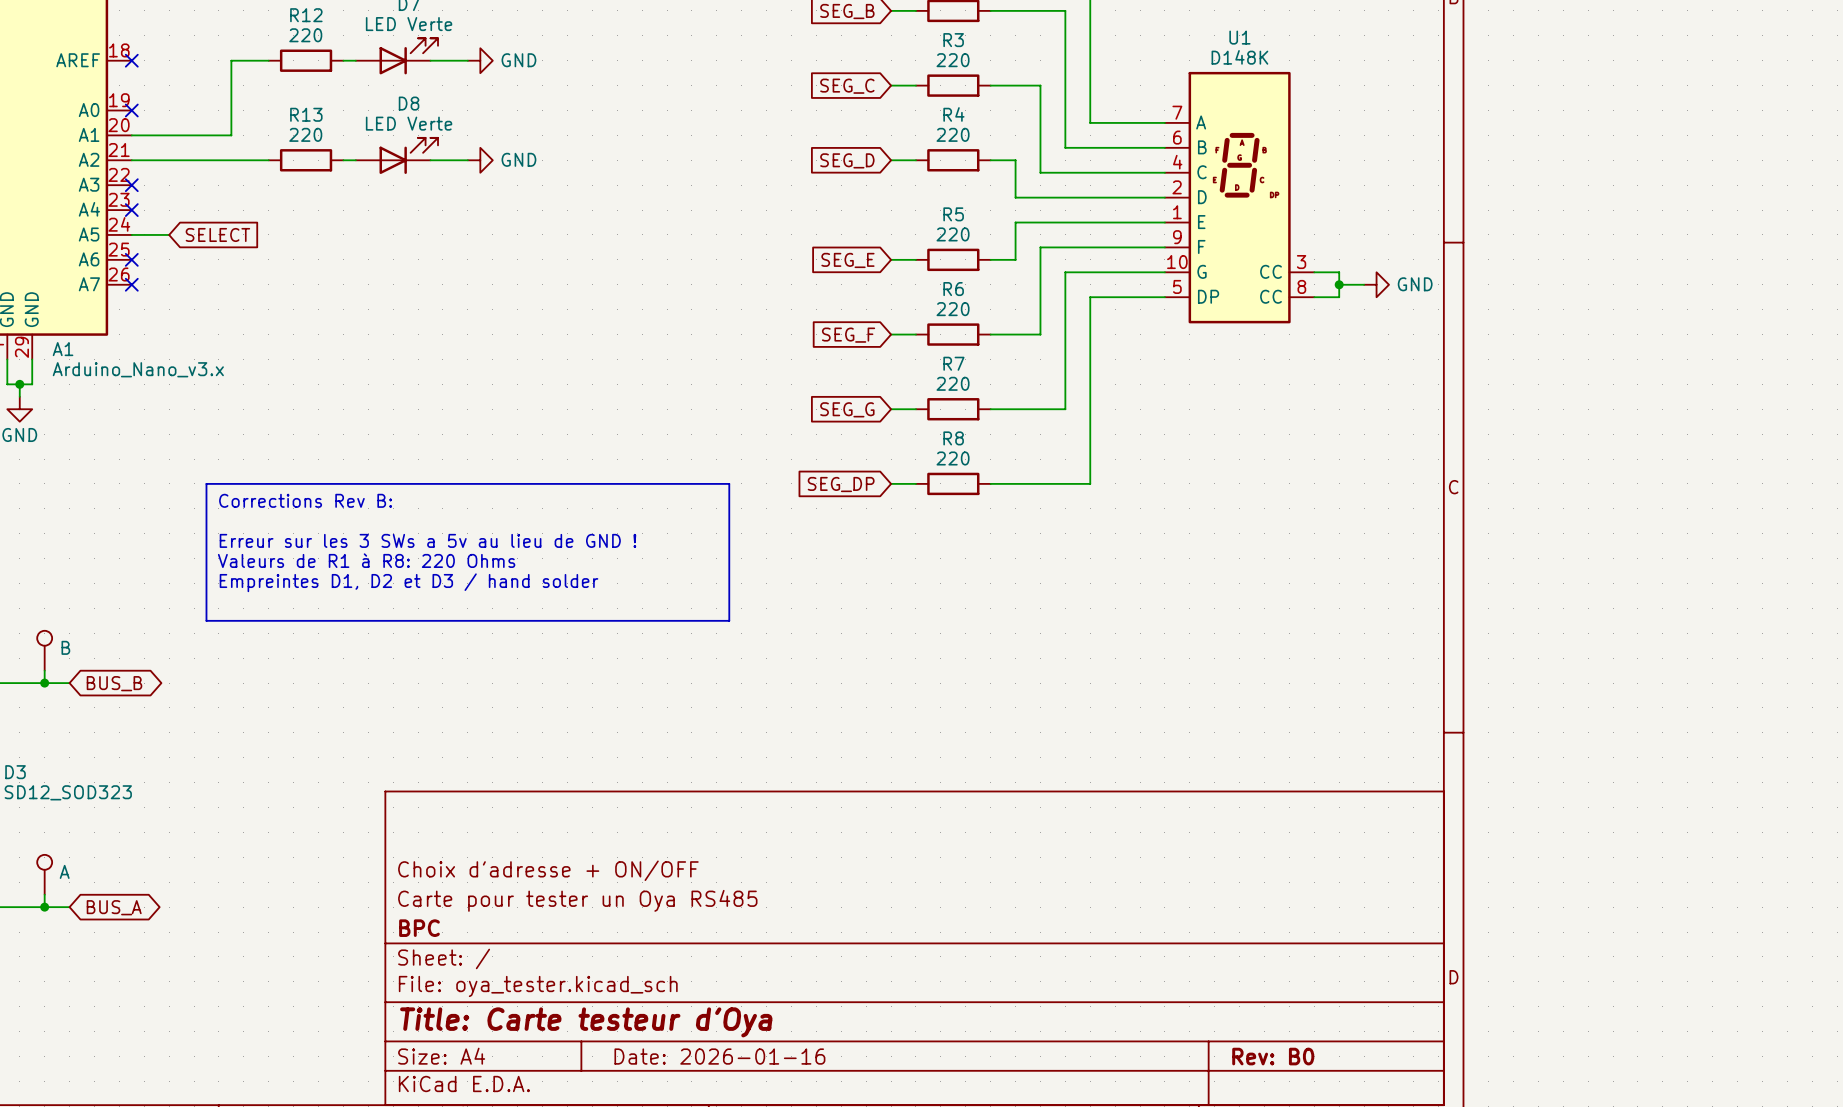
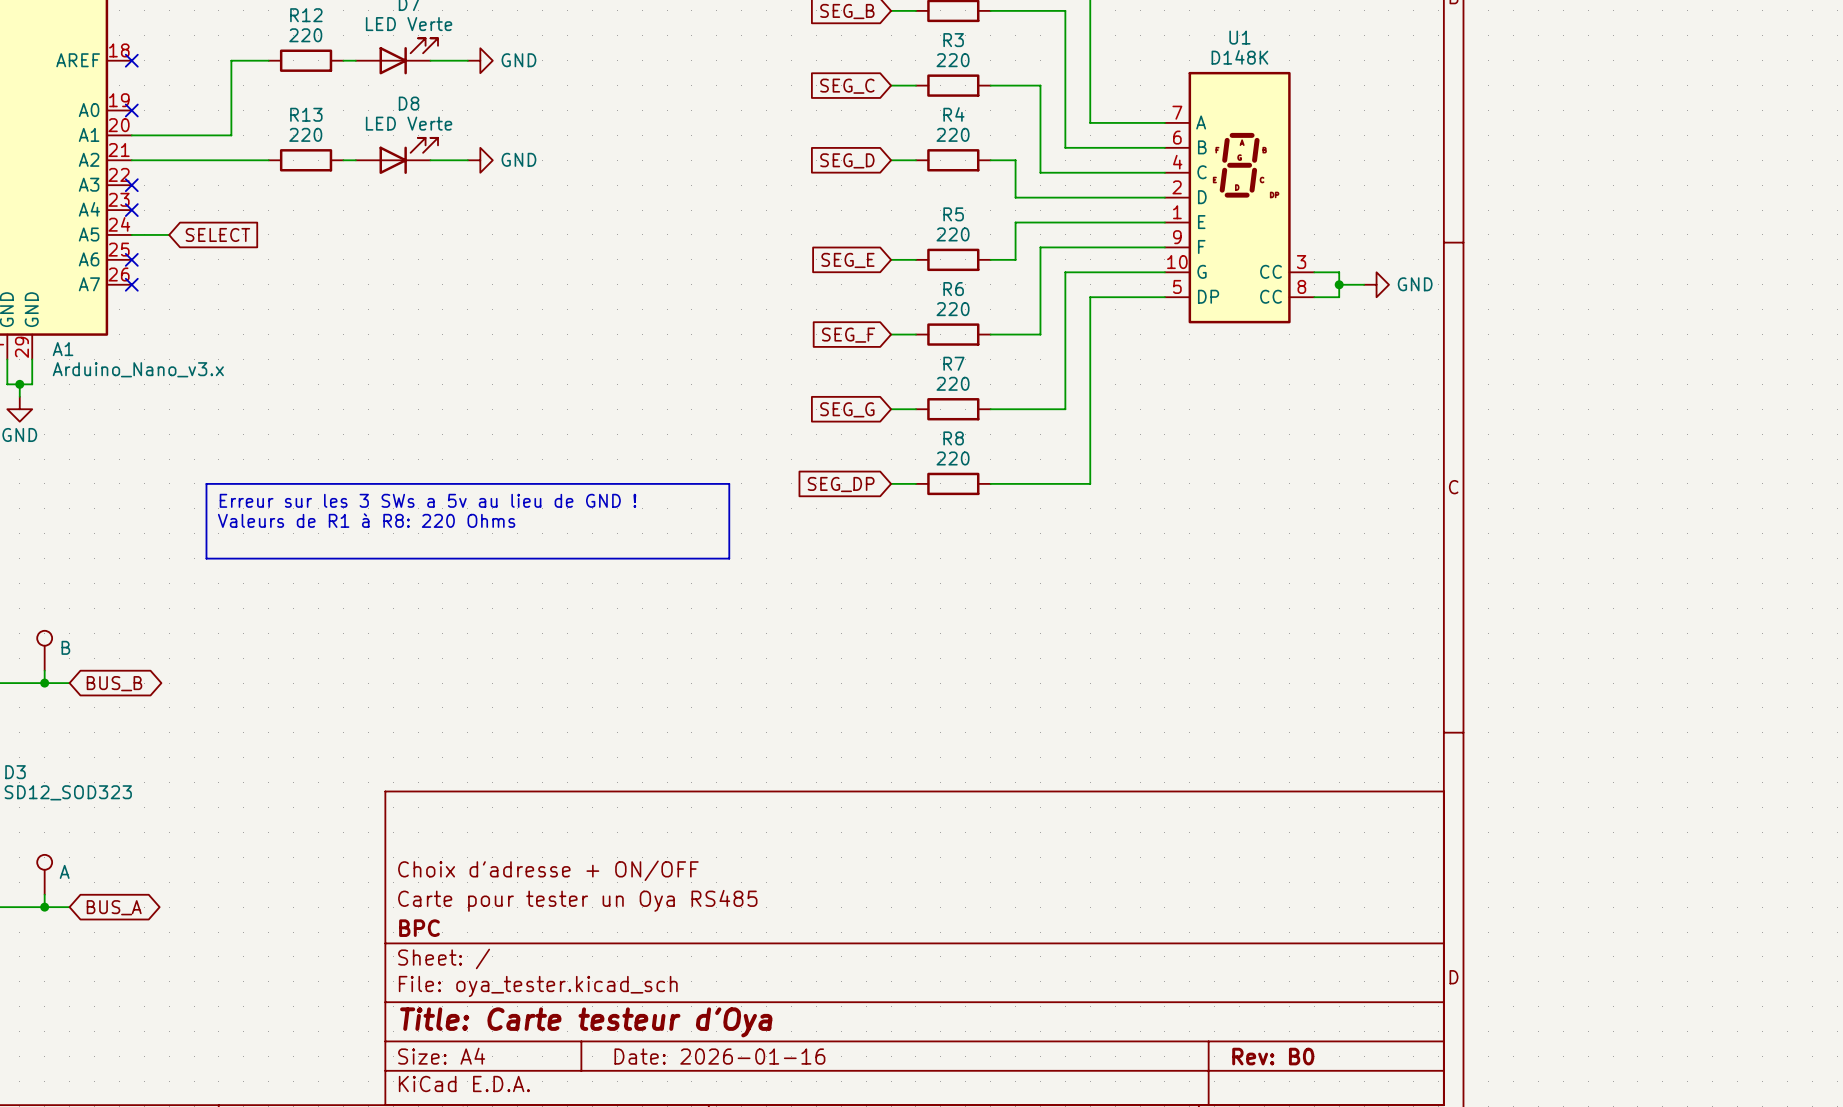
text: Corrections Rev B: (305, 500) -> Erreur sur les 3 SWs a 5v au lieu de GND ! (427, 500)
text: Erreur sur les 3 SWs a 5v au lieu de GND ! (427, 540) -> none
line: (206, 558) (206, 620) (729, 620) (729, 558) -> (206, 558) (729, 558)
text position: Valeurs de R1 à R8: 220 Ohms (366, 560) -> Valeurs de R1 à R8: 220 Ohms (366, 520)
text: Empreintes D1, D2 et D3 / hand solder (409, 582) -> none

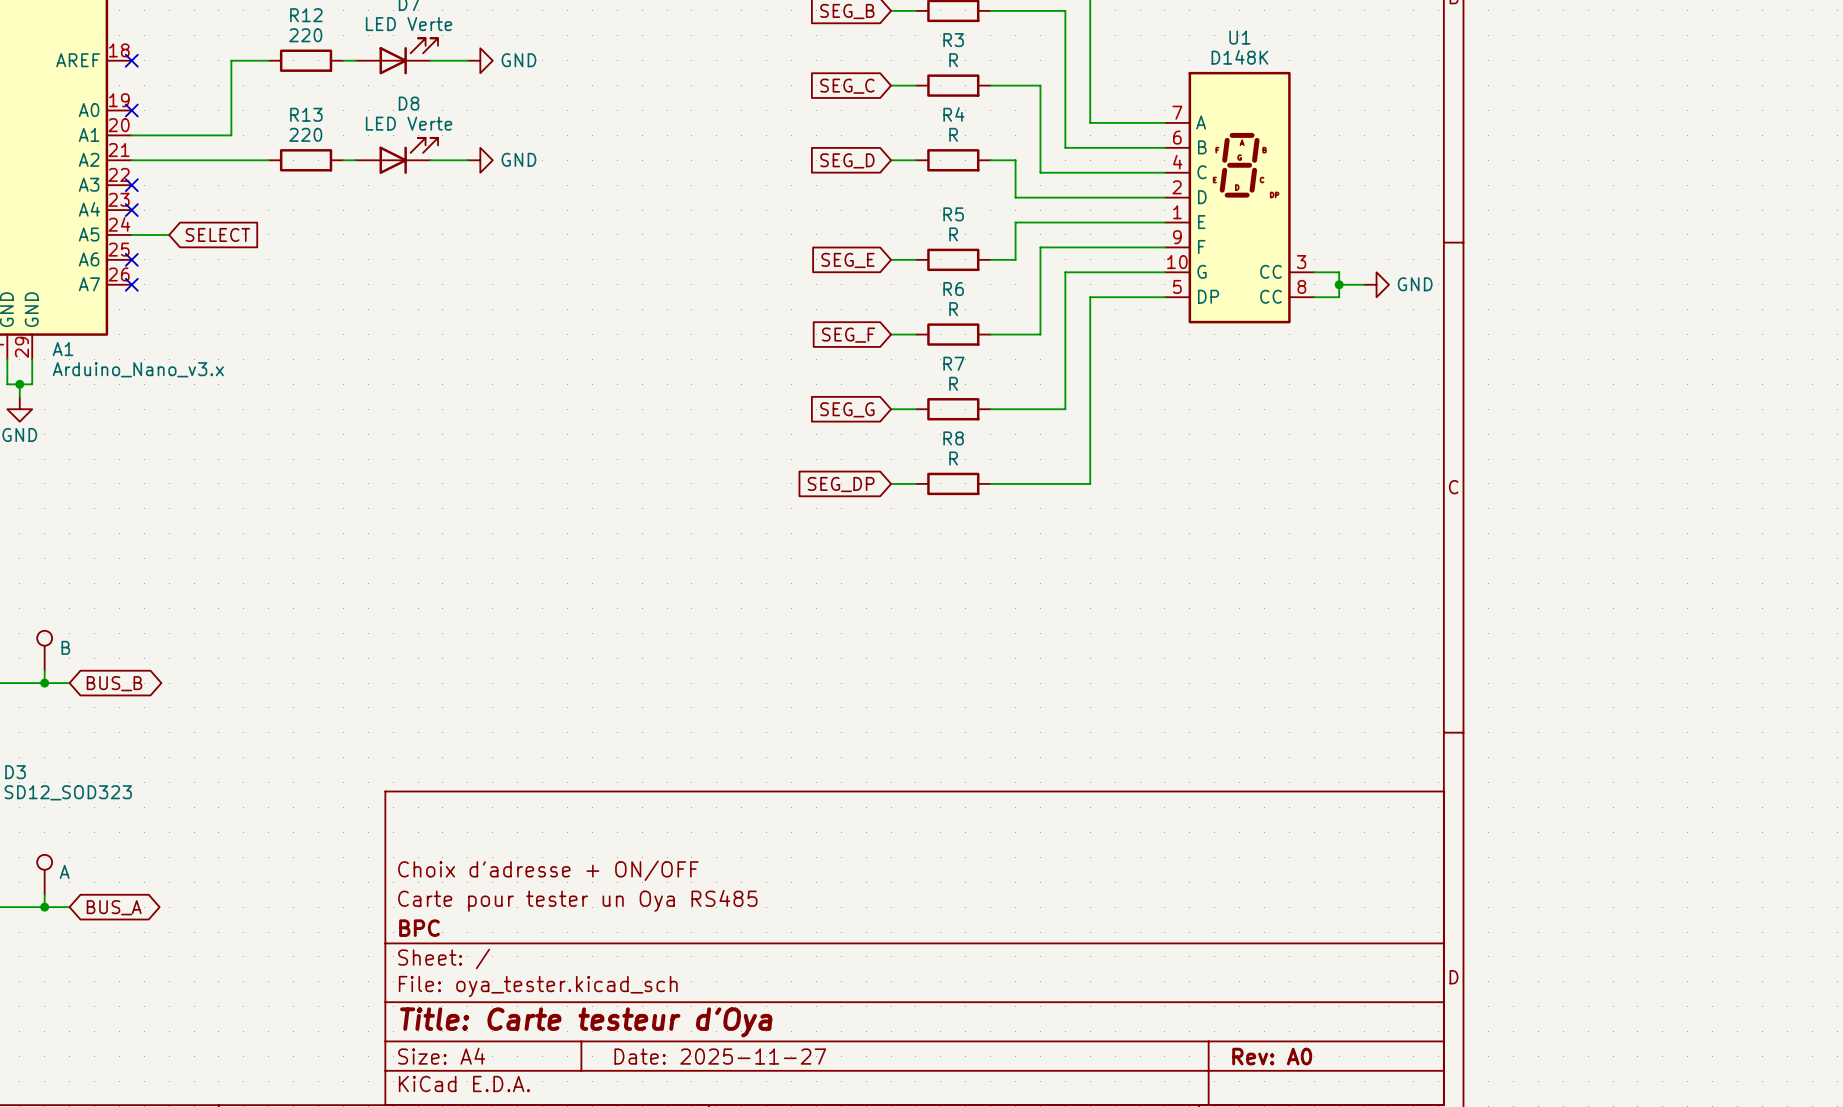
R3 value: 220 (953, 60) -> R (953, 60)
R4 value: 220 (953, 134) -> R (953, 134)
R5 value: 220 (953, 234) -> R (953, 234)
R6 value: 220 (953, 309) -> R (953, 309)
R7 value: 220 (953, 383) -> R (953, 383)
R8 value: 220 (953, 458) -> R (953, 458)
line: (206, 483) (729, 483) (729, 558) (206, 558) (206, 483) -> none
text: Erreur sur les 3 SWs a 5v au lieu de GND ! (427, 500) -> none
text: Valeurs de R1 à R8: 220 Ohms (366, 520) -> none
title block: Date: 2026-01-16 (719, 1056) -> Date: 2025-11-27 (720, 1056)
title block: Rev: B0 (1273, 1056) -> Rev: A0 (1272, 1056)

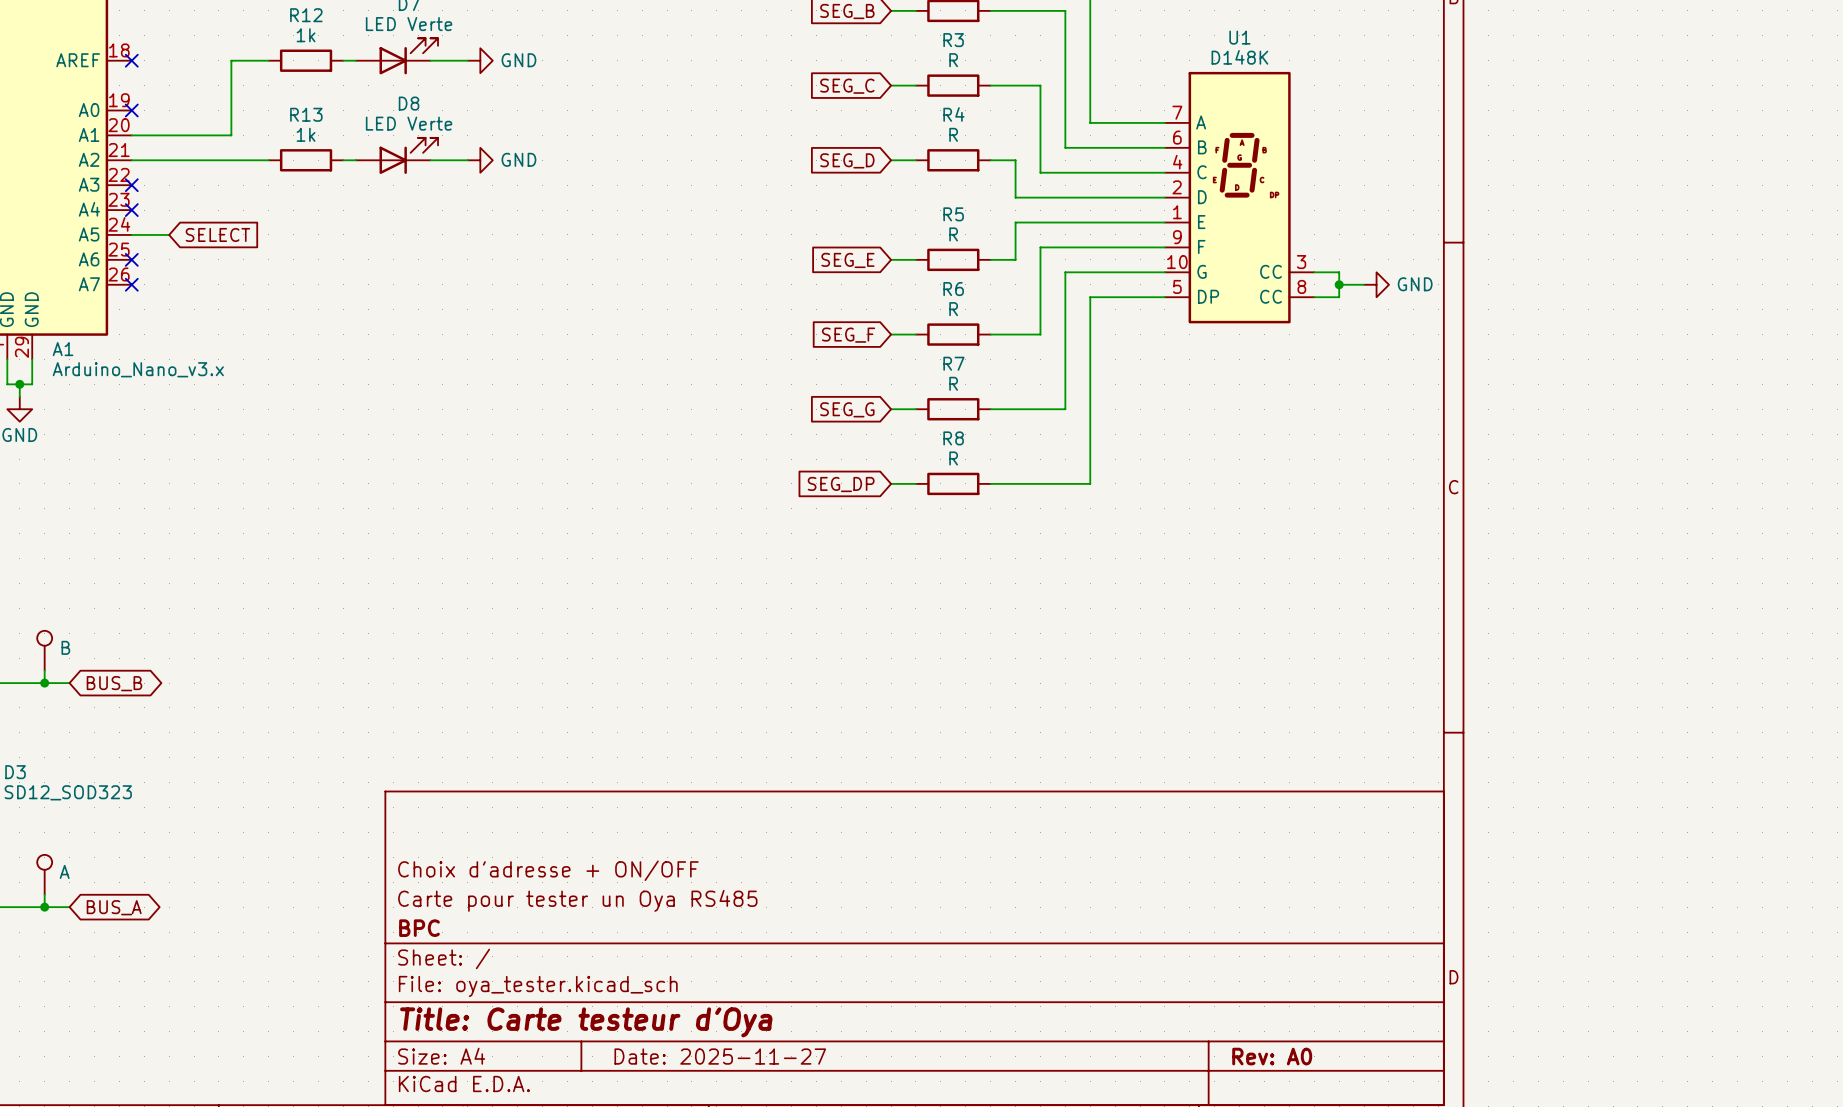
R12 value: 220 (305, 35) -> 1k (306, 35)
R13 value: 220 (305, 134) -> 1k (306, 134)

